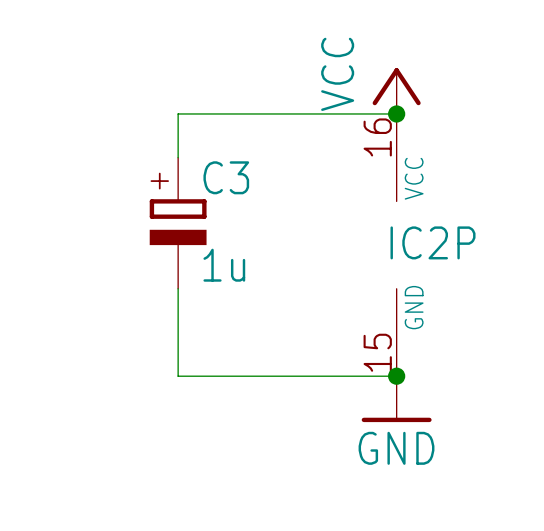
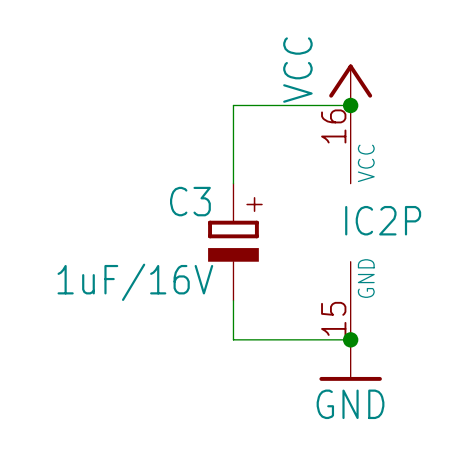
wire: (265, 113) (178, 113) (178, 157) -> (233, 105) (233, 183)
C3 name position: C3 (226, 177) -> C3 (190, 201)
C3 text position: + (159, 181) -> + (254, 204)
C3 position: (178, 223) -> (233, 242)
C3 value: 1u (224, 265) -> 1uF/16V (135, 282)
wire: (178, 288) (178, 376) (265, 376) -> (233, 300) (233, 339)

